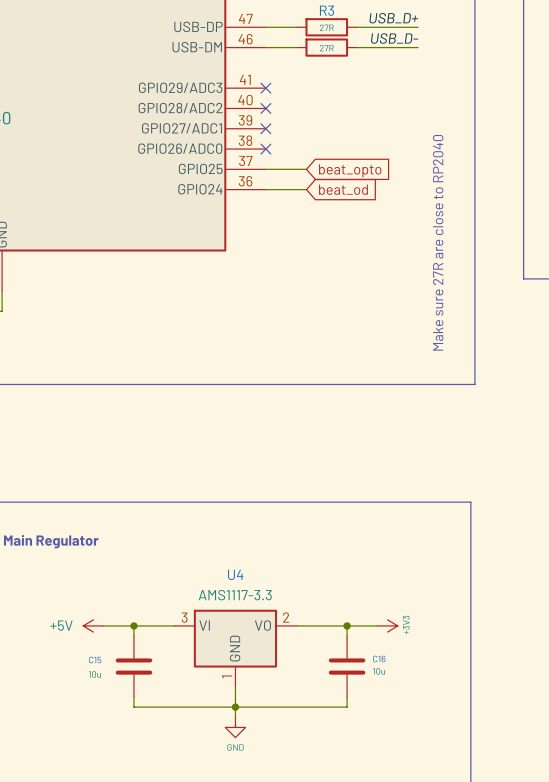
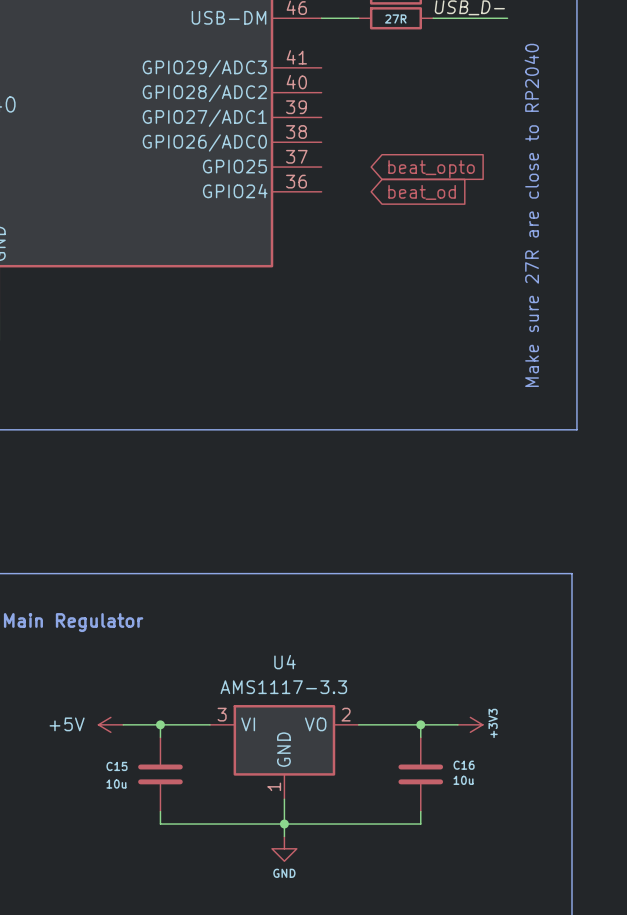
no-connect mark: (265, 88) -> none
no-connect mark: (265, 108) -> none
no-connect mark: (265, 128) -> none
no-connect mark: (265, 149) -> none
wire: (265, 169) (306, 169) -> none
wire: (265, 189) (306, 189) -> none

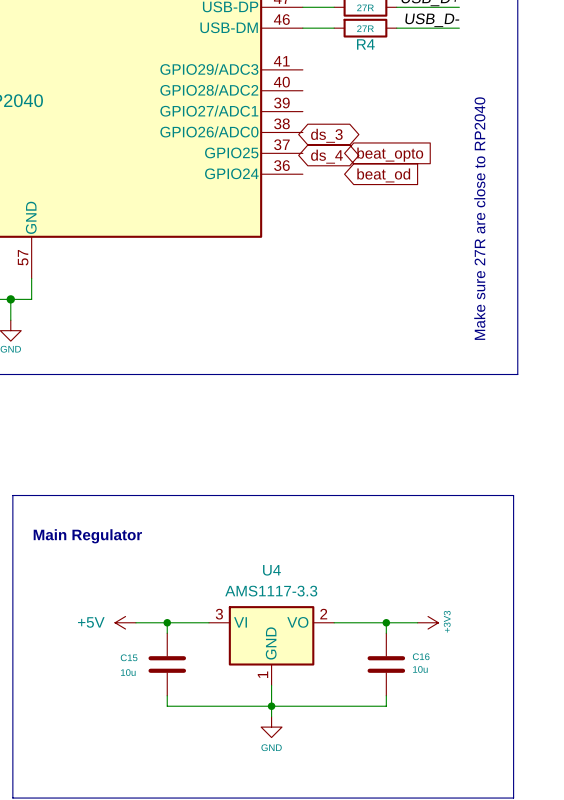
R4 name: none -> R4 (365, 44)
global label: none -> ds_3 (326, 135)
global label: none -> ds_4 (326, 156)

